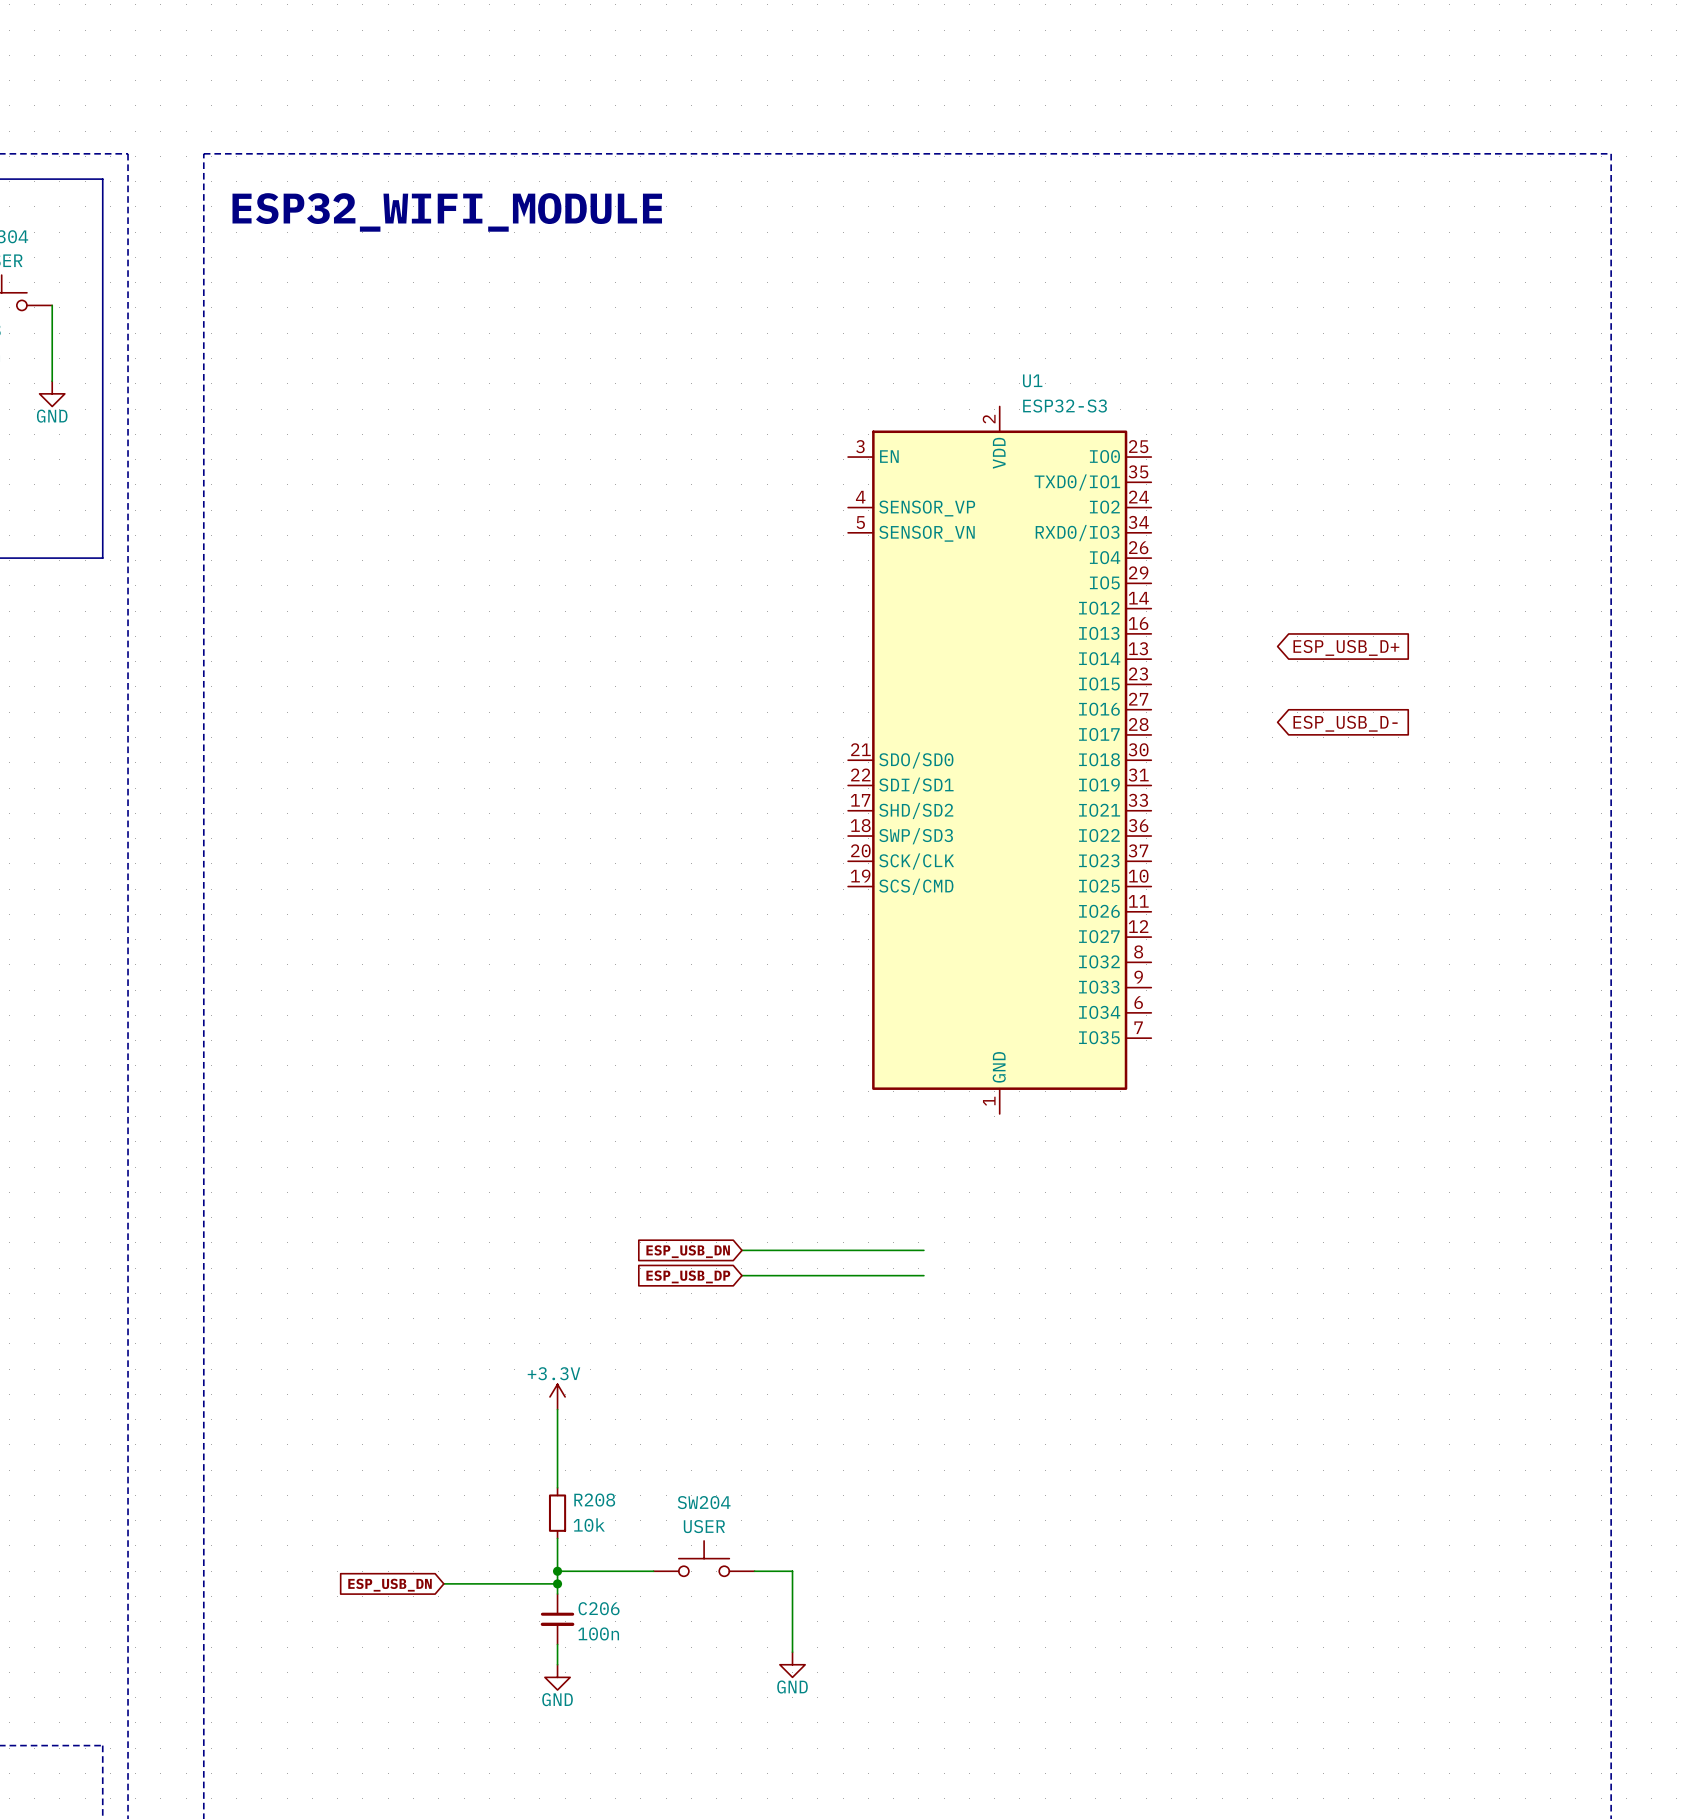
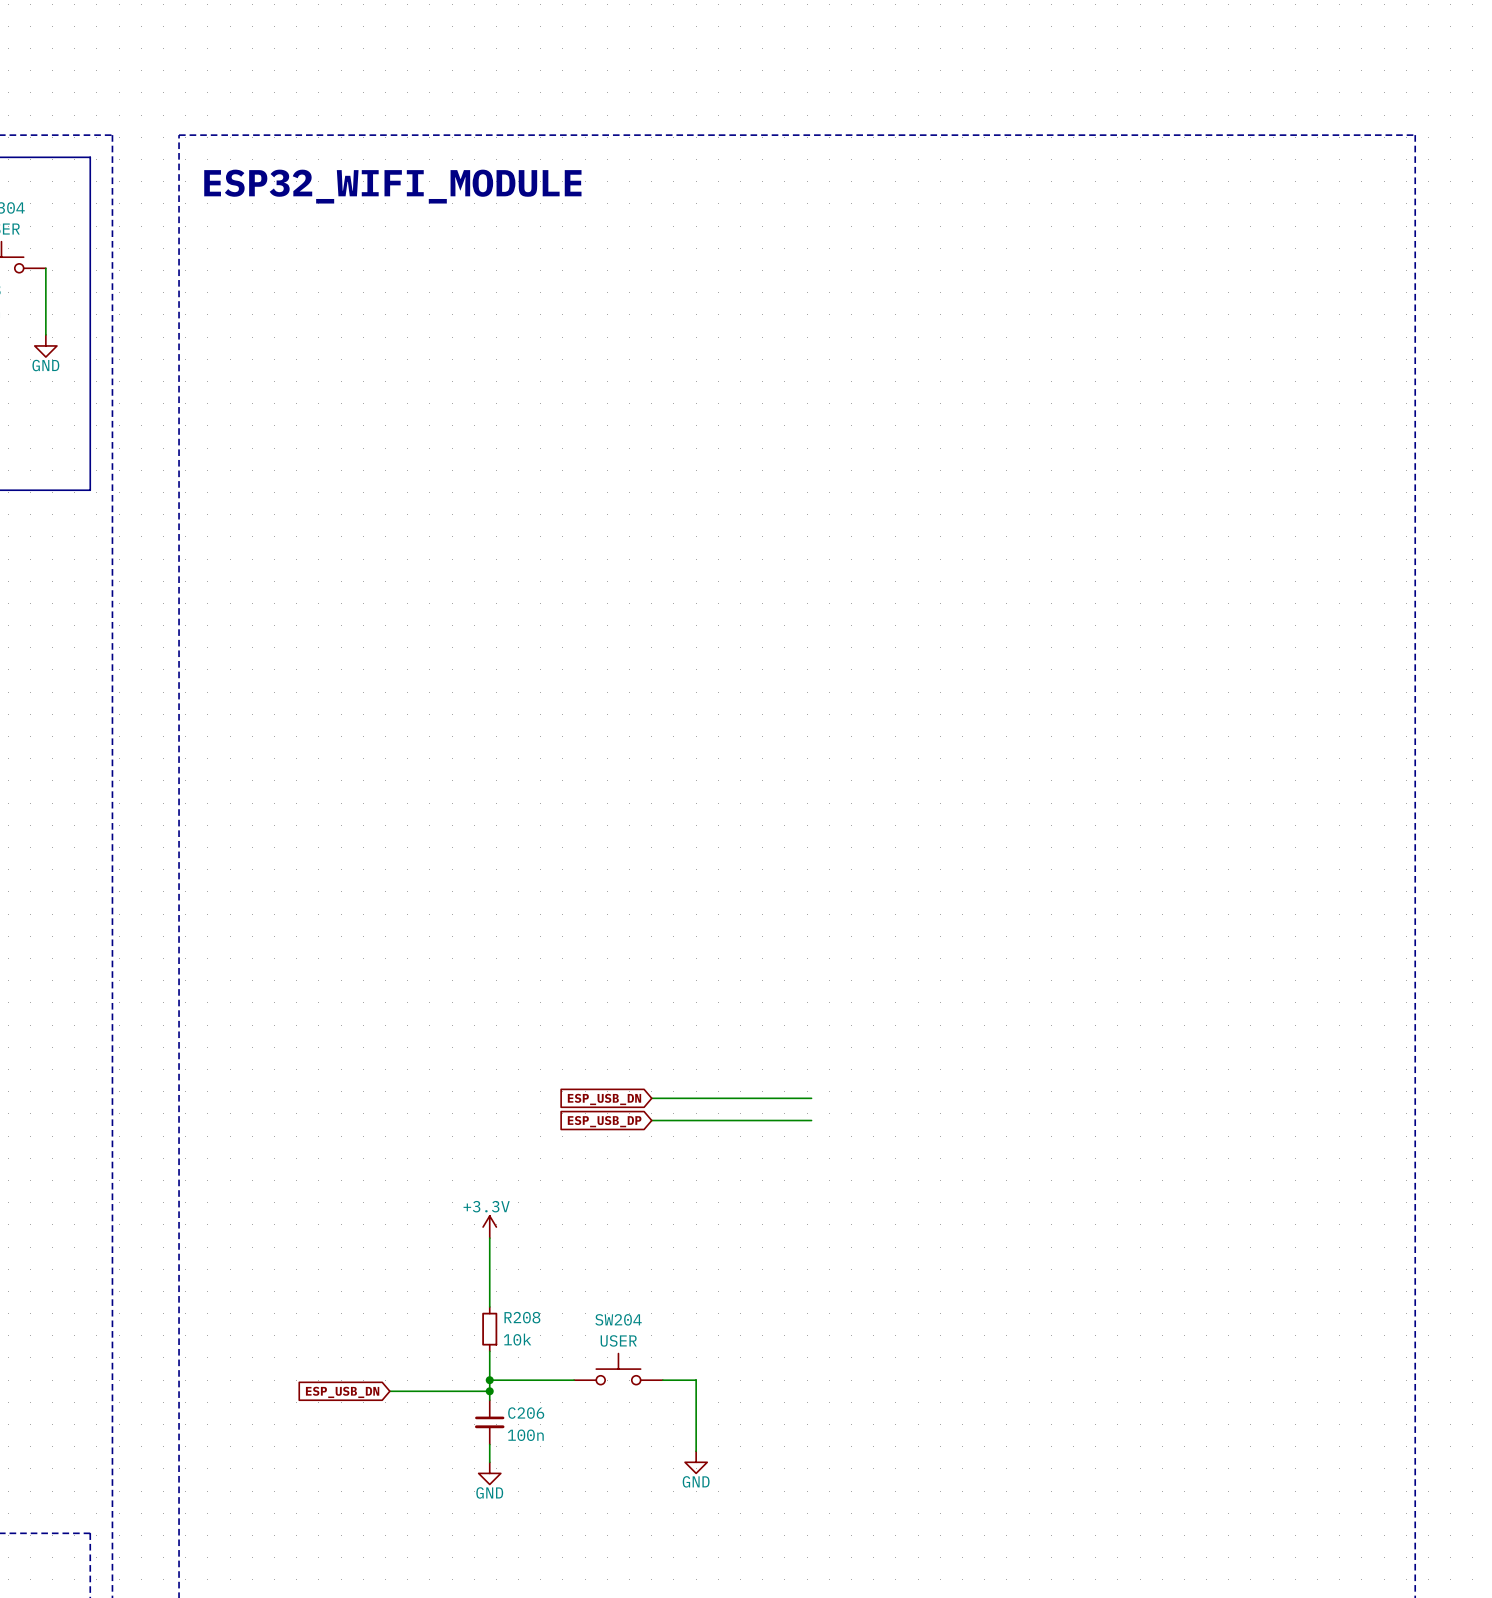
global label: ESP_USB_D+ (1346, 647) -> none
global label: ESP_USB_D- (1345, 723) -> none
U1: ESP32-S3 (999, 760) -> none

